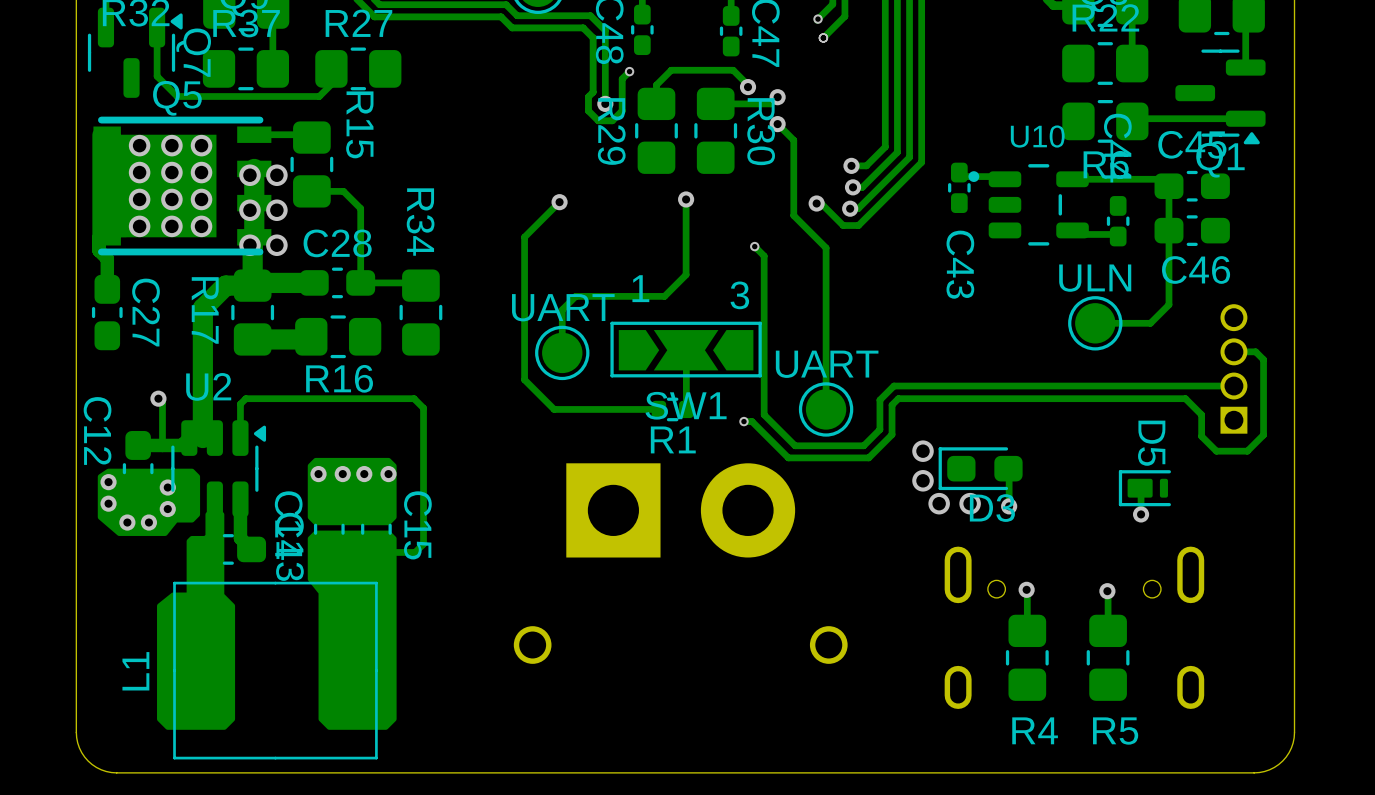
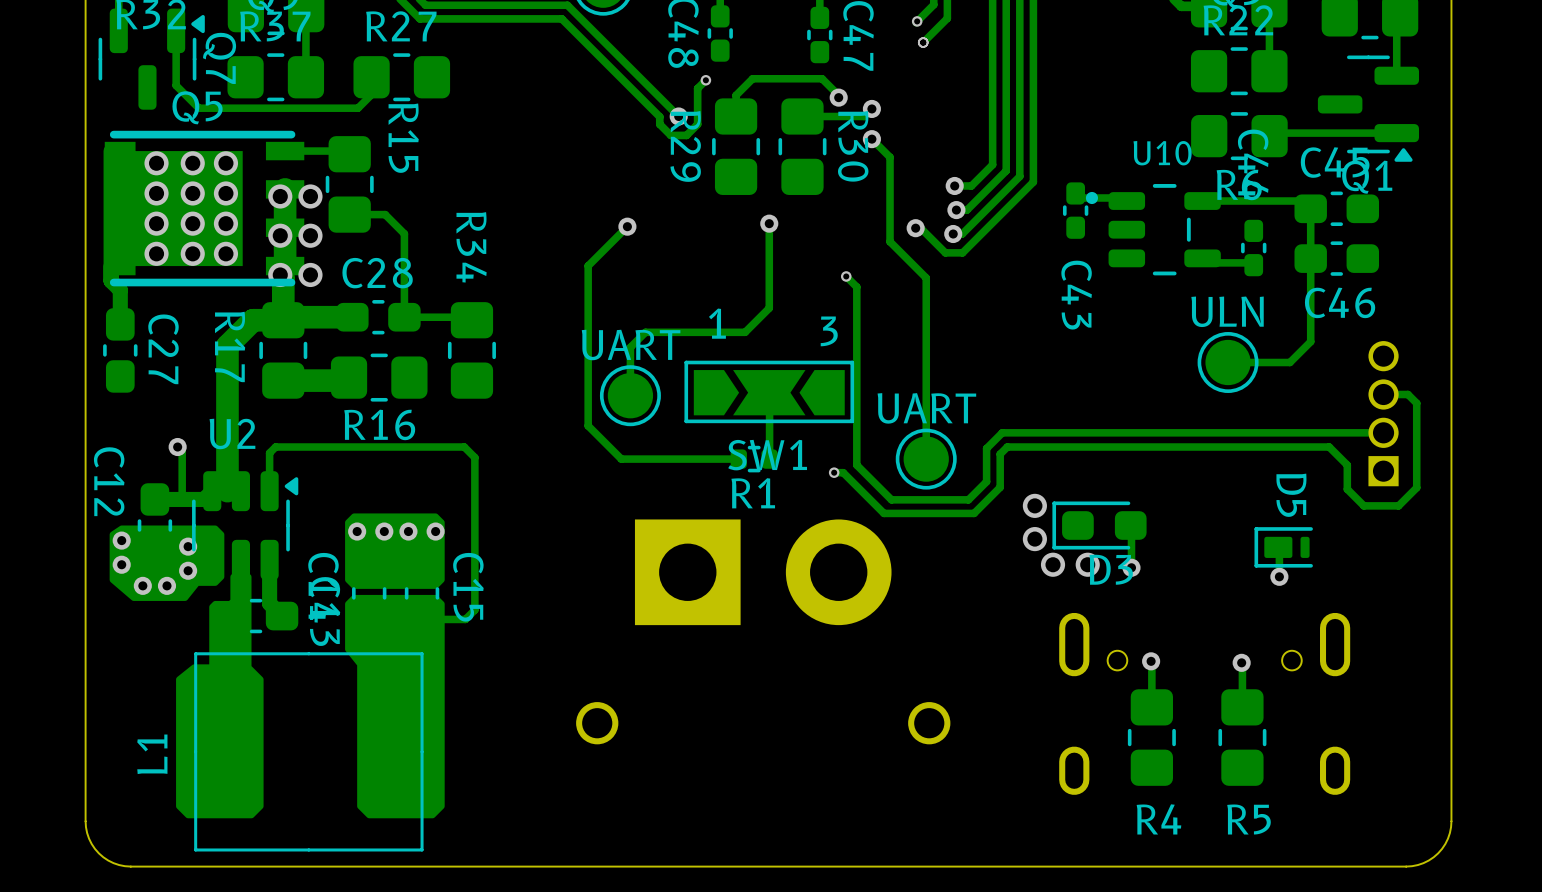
track: (517, 15) (590, 15) (605, 30) (605, 103) -> (579, 17) (678, 116)
track: (512, 27) (583, 27) (593, 37) (593, 92) (588, 96) (588, 104) -> (574, 31) (659, 116)

